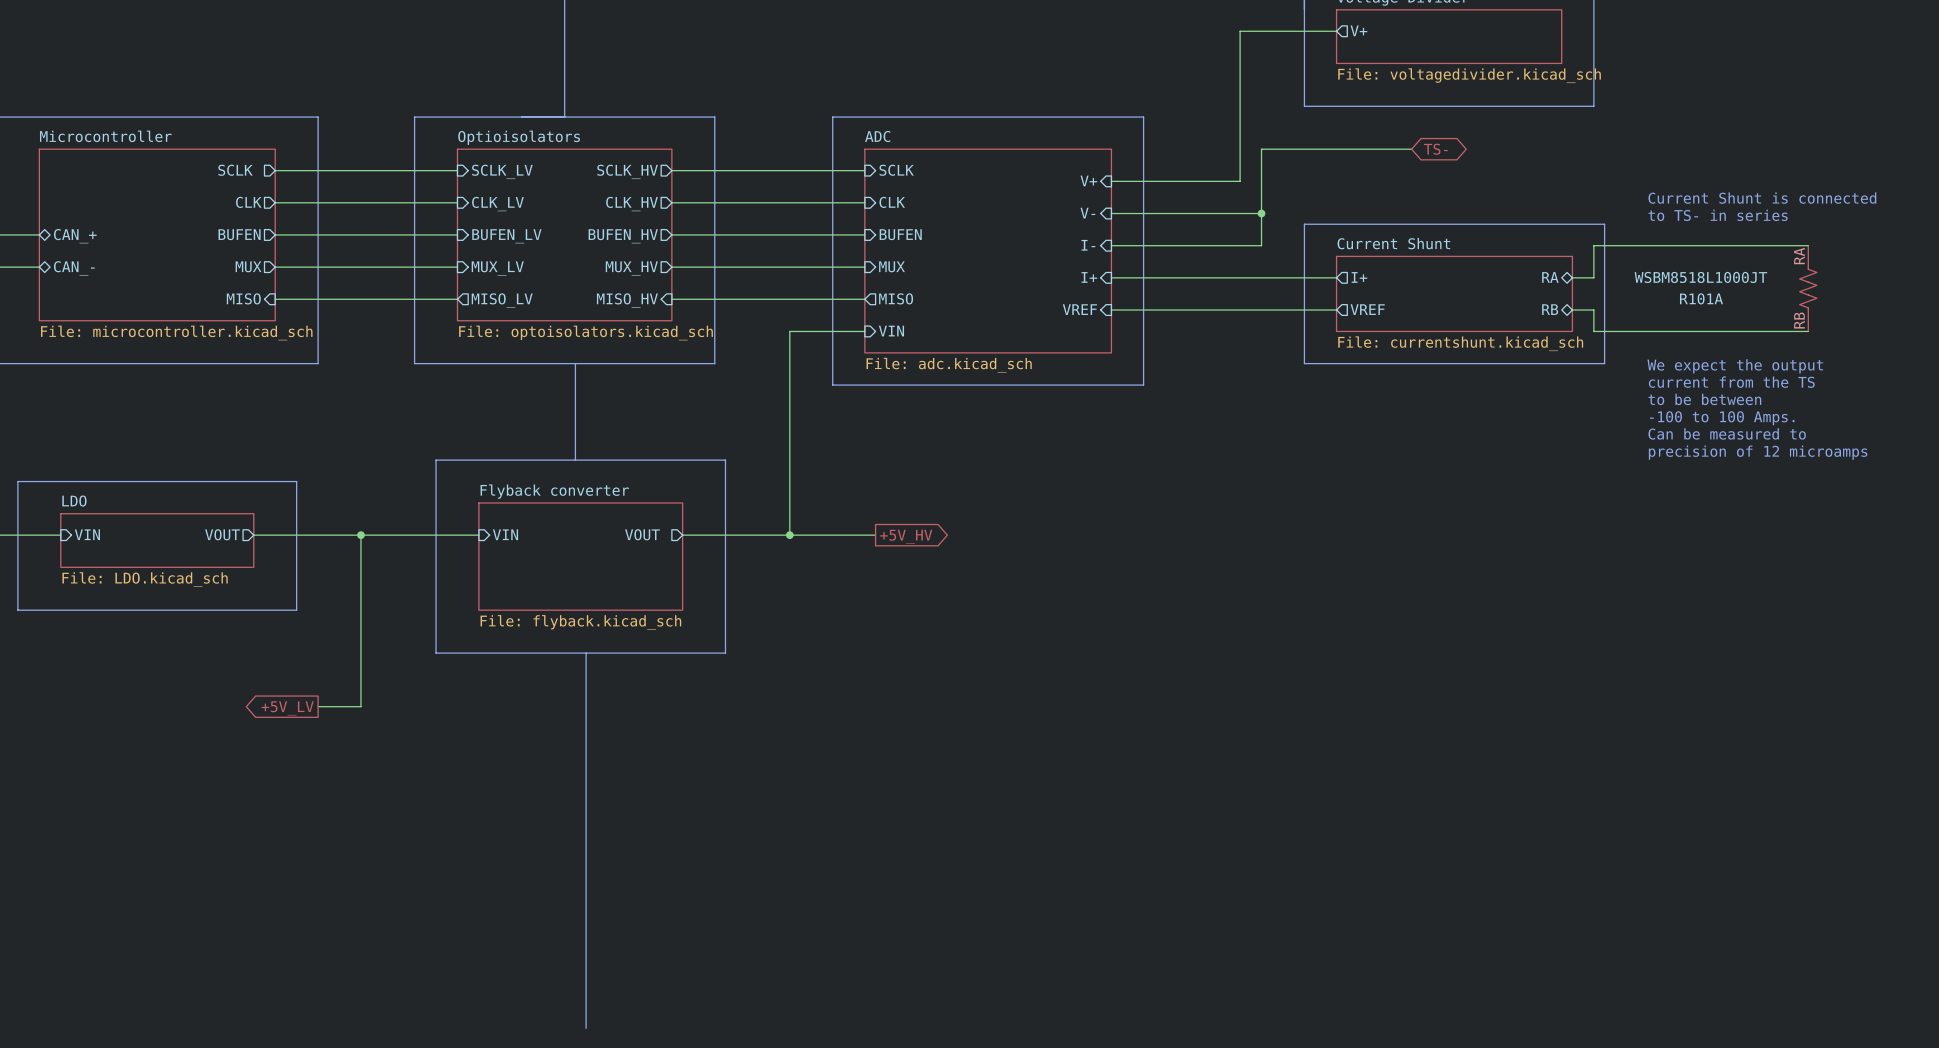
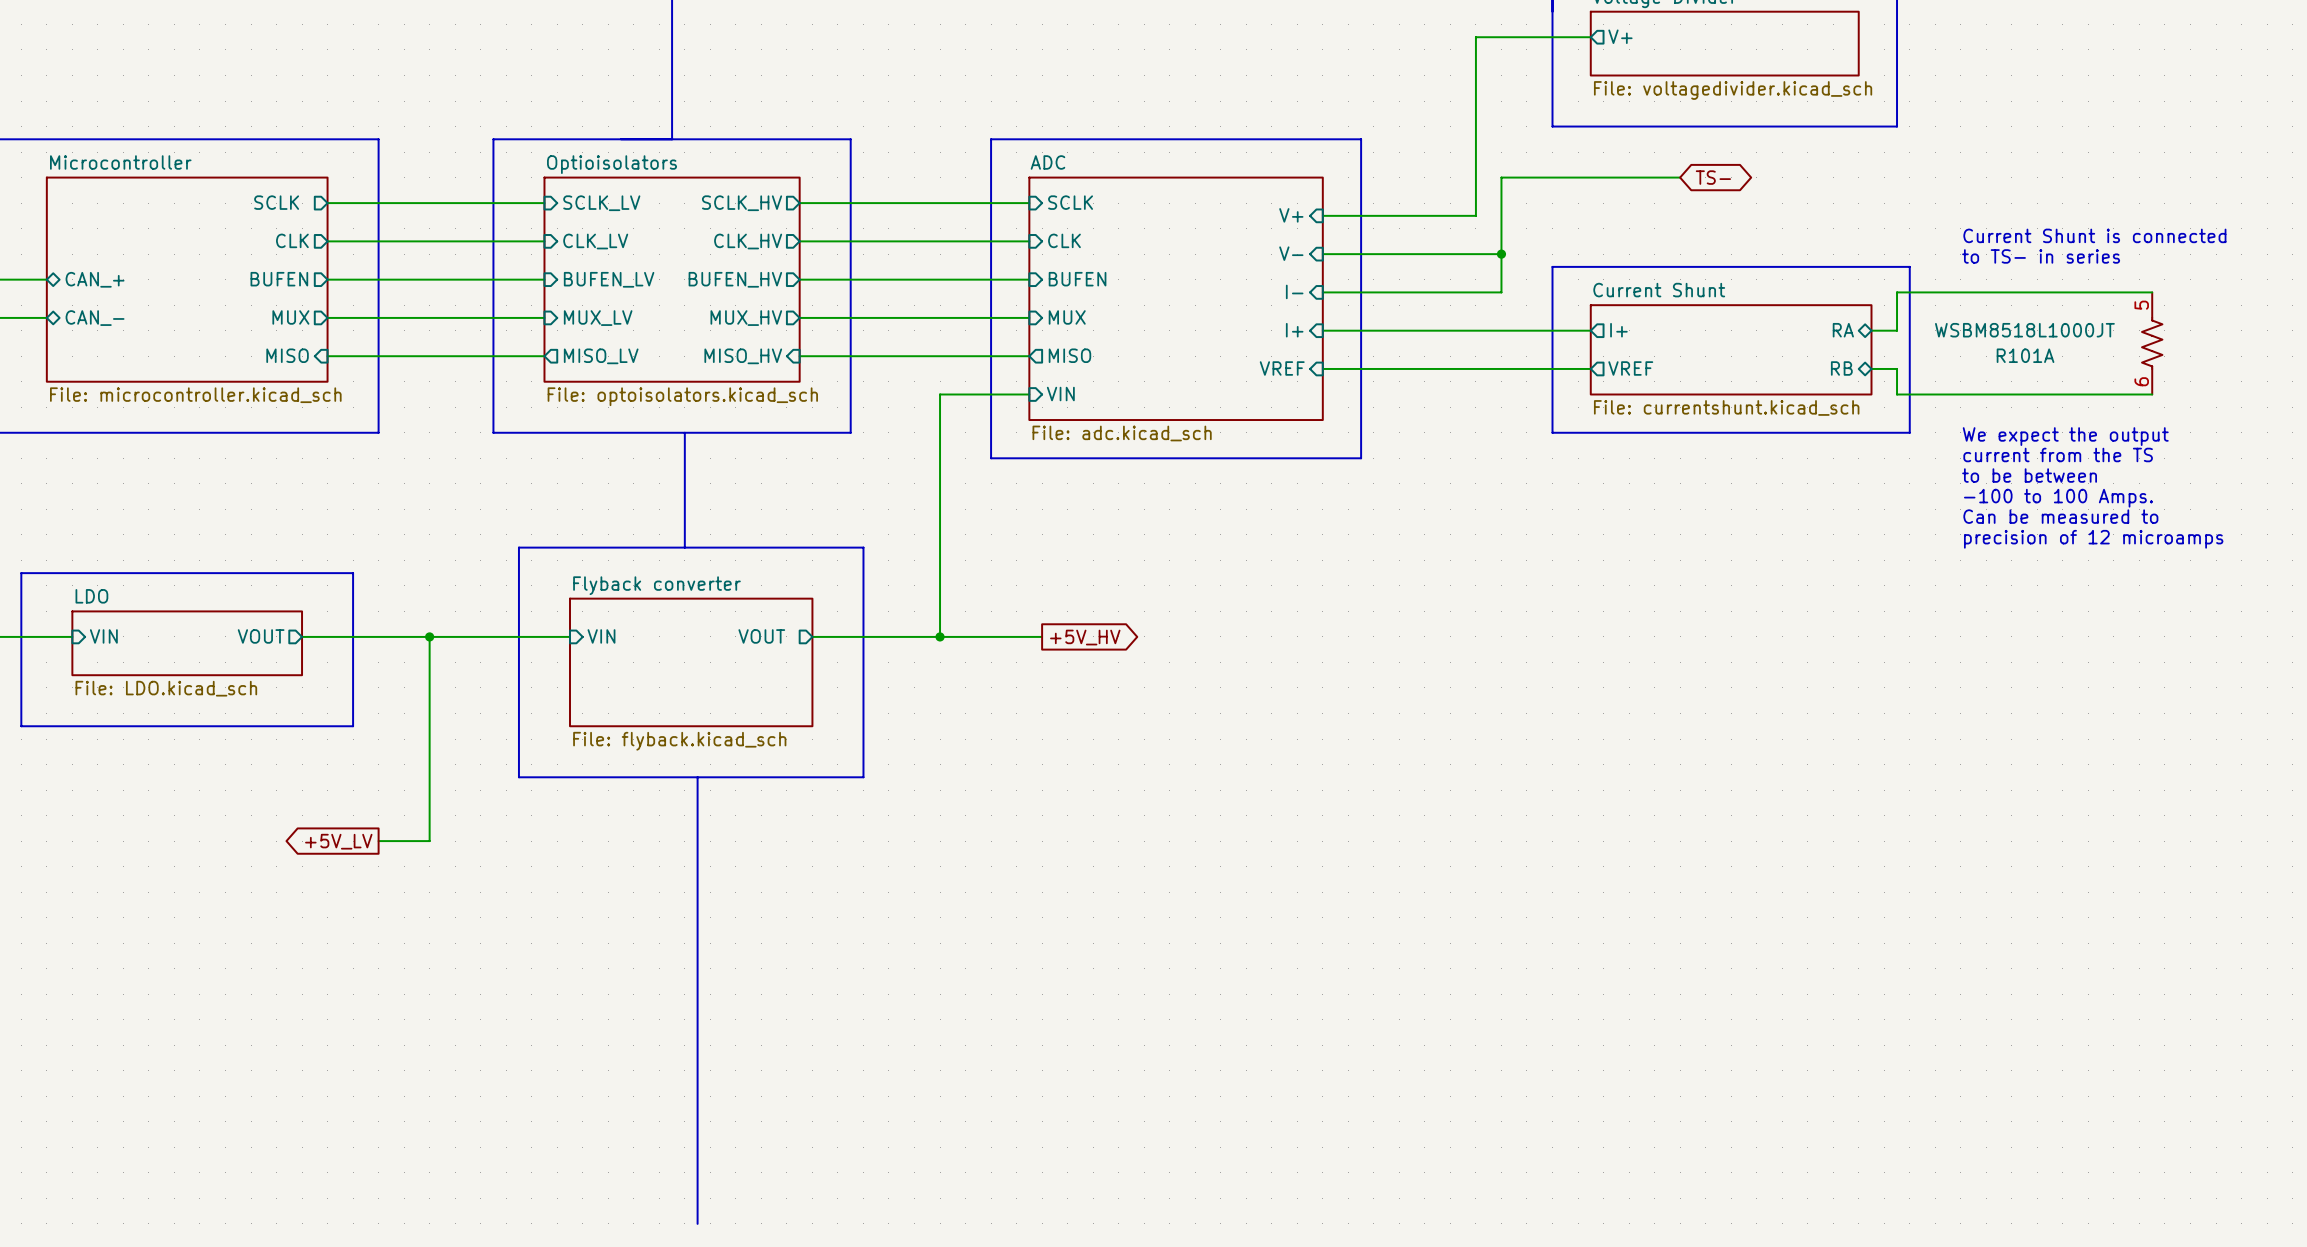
R101A pin number: RA (1799, 256) -> 5 (2141, 305)
R101A pin number: RB (1799, 320) -> 6 (2141, 381)

